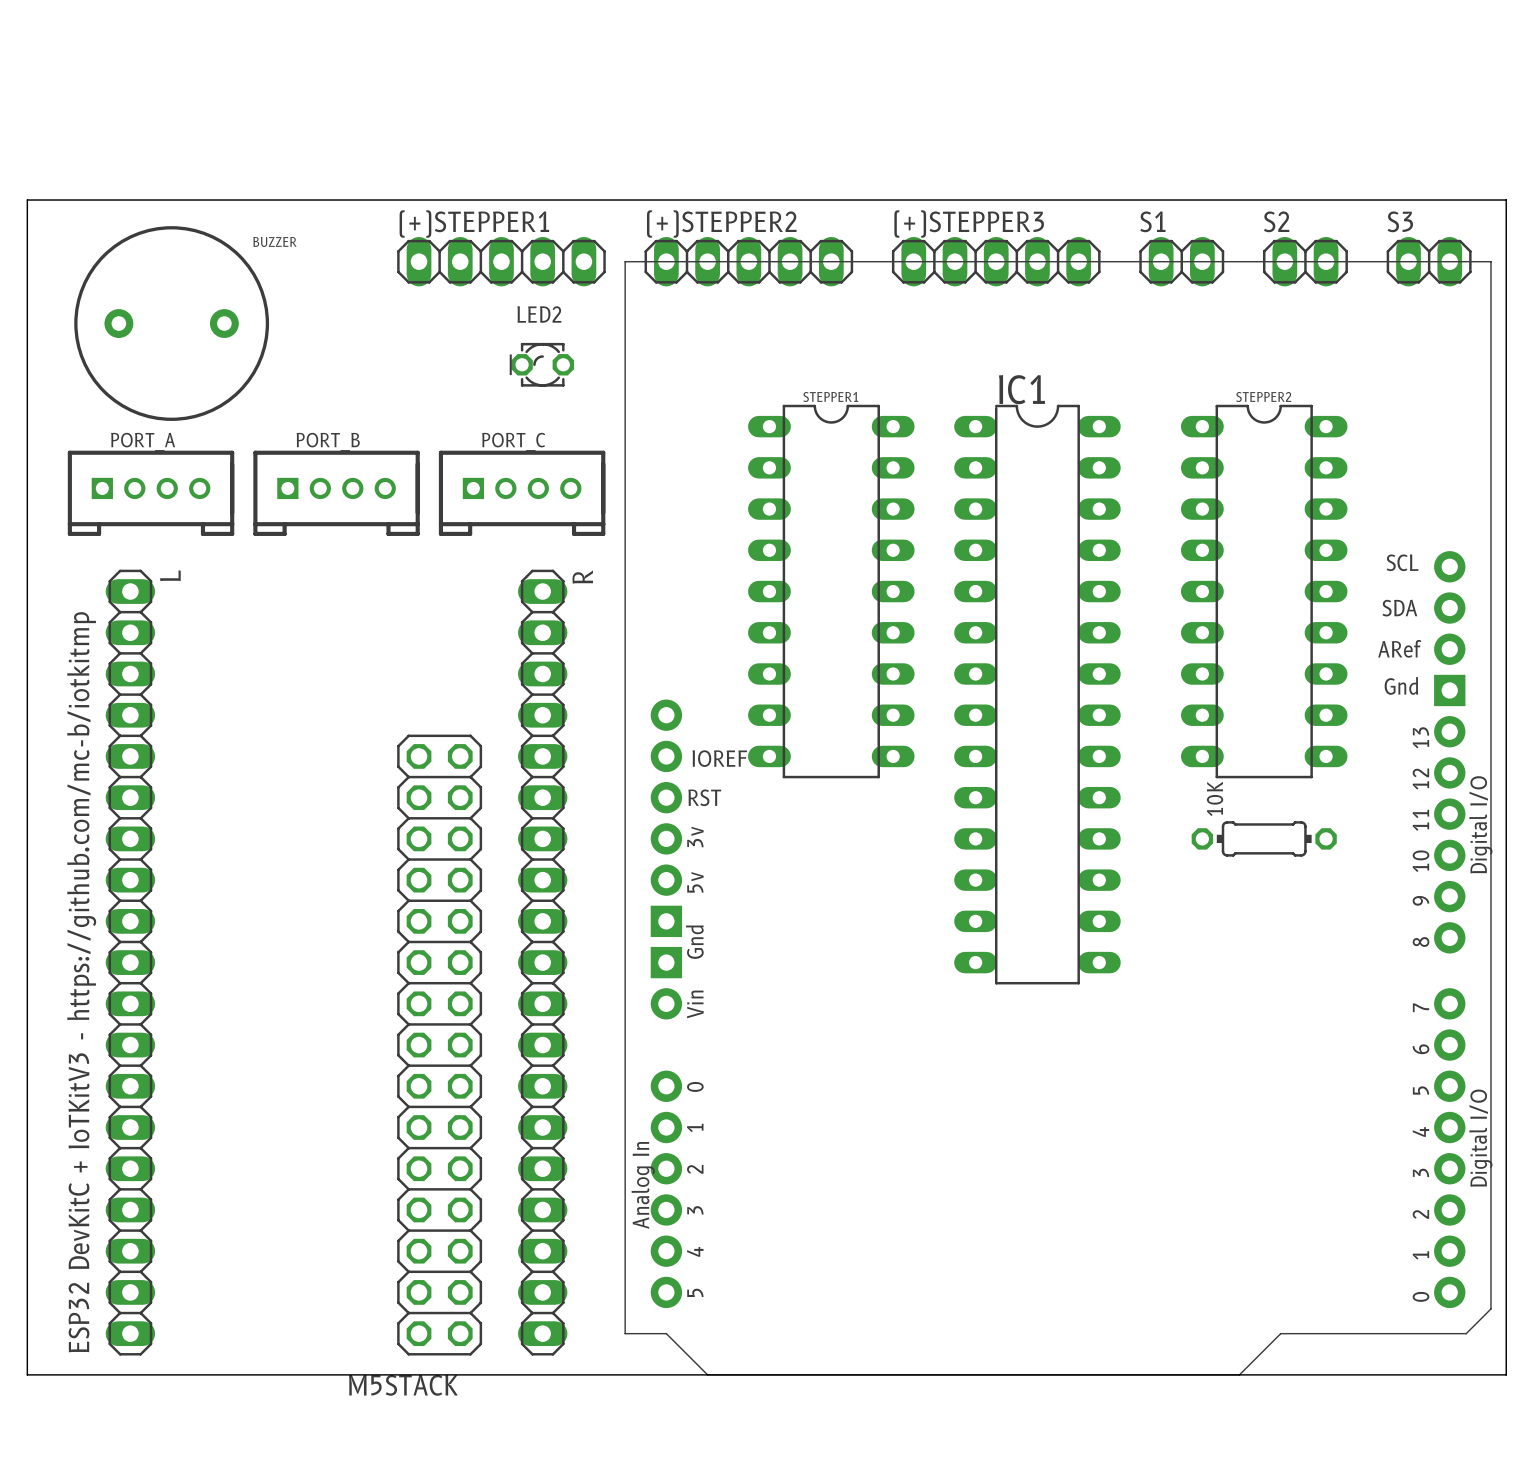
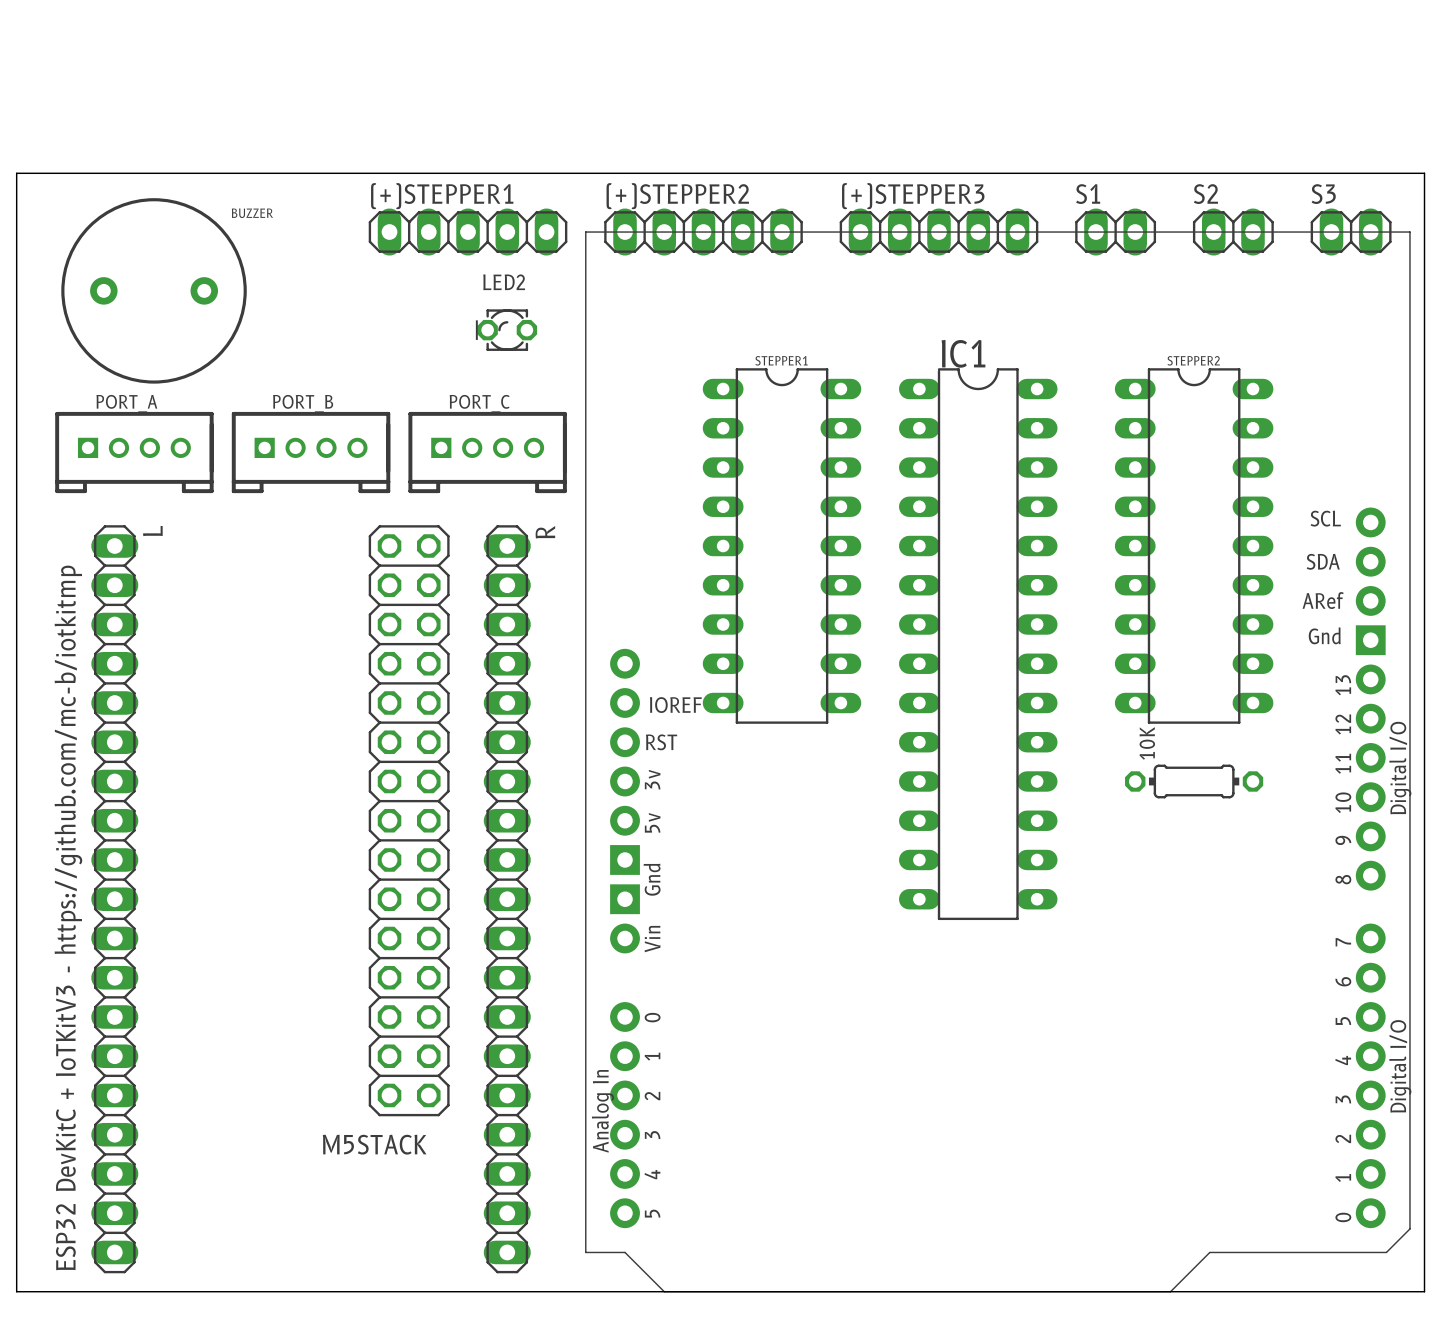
M5STACK position: (439, 1045) -> (409, 820)

